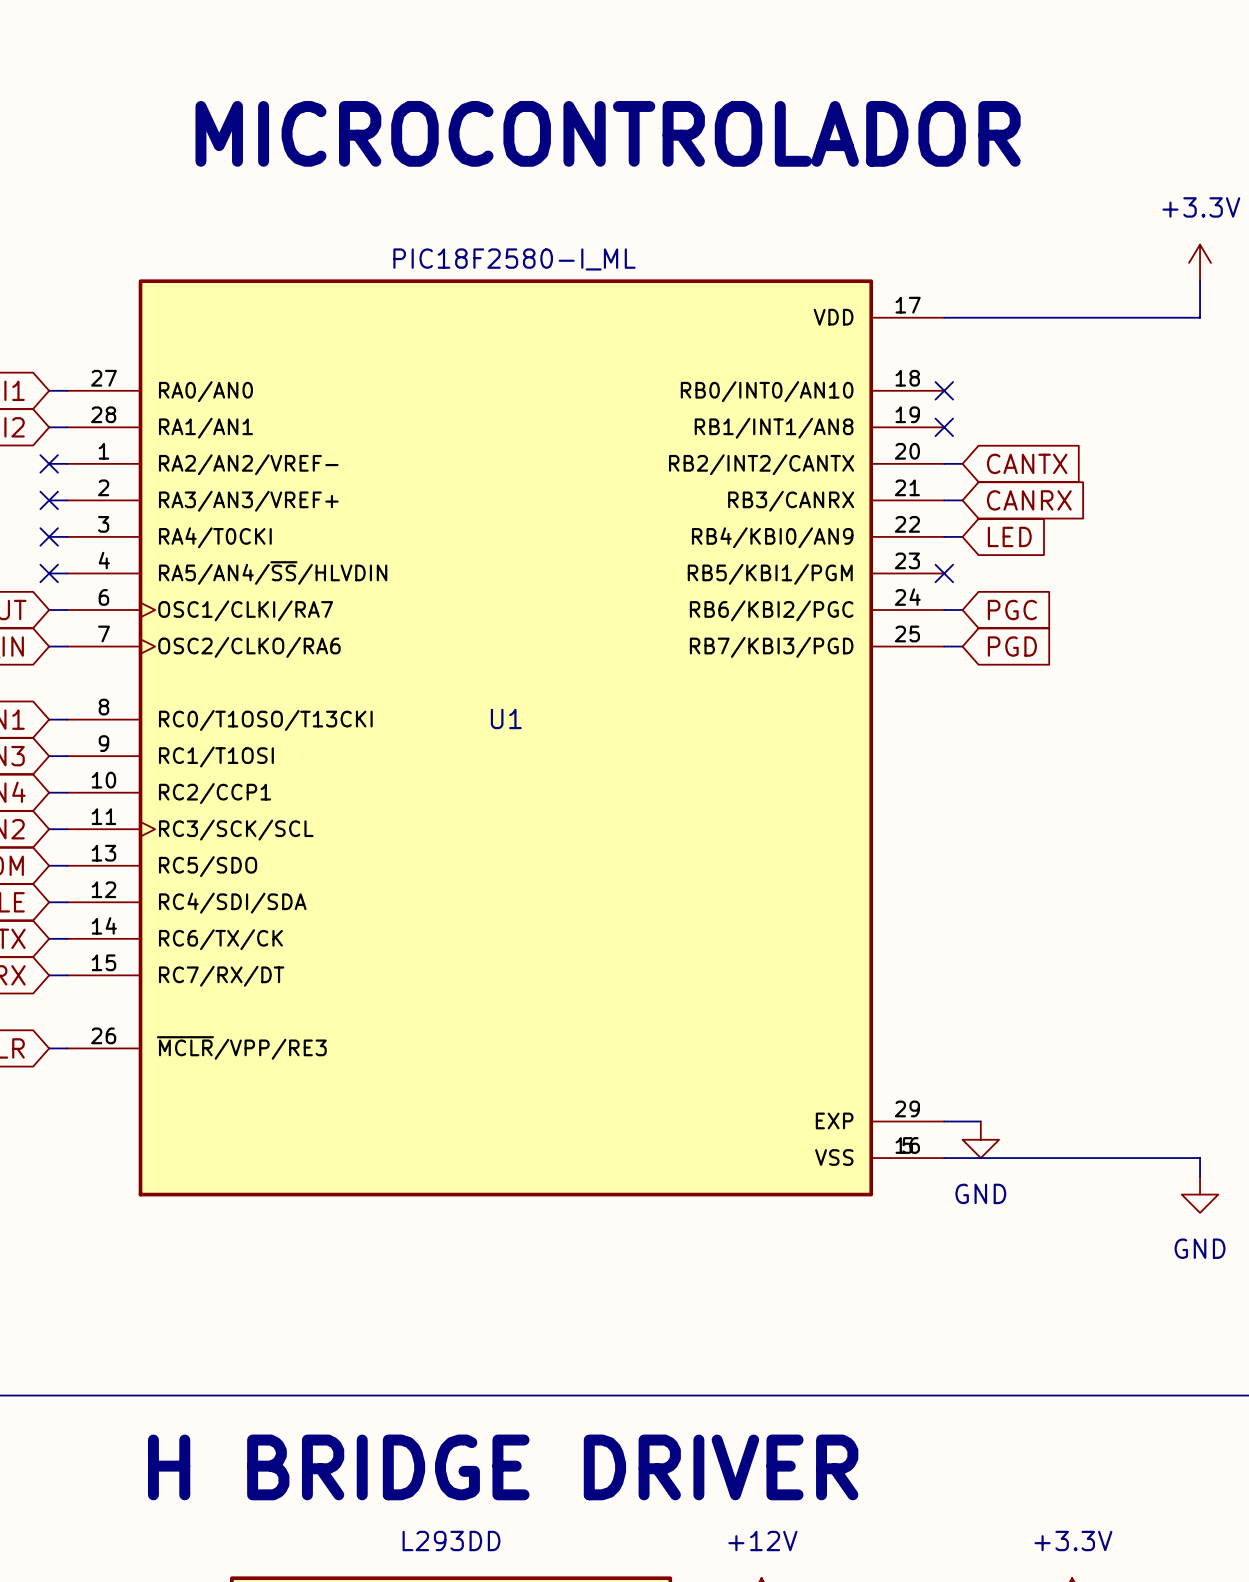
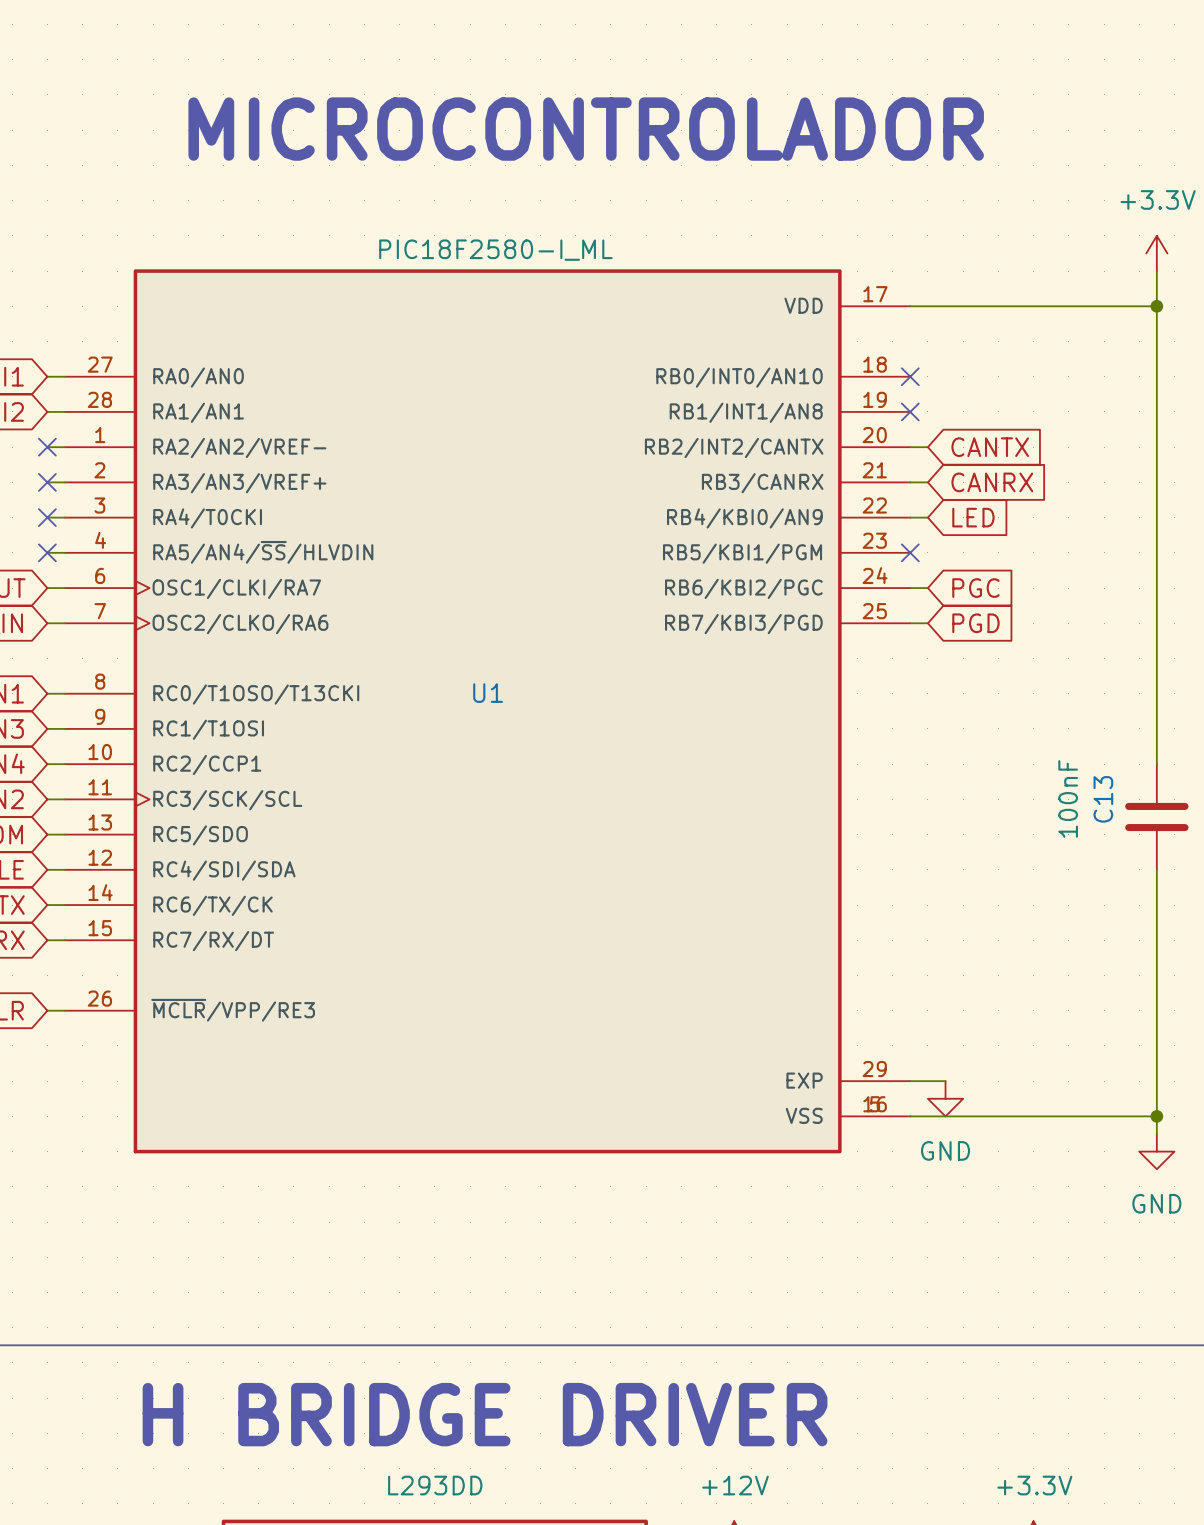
wire: none -> (1156, 306) (1156, 764)
junction: none -> (1156, 306)
C13: none -> 100nF (1156, 816)
wire: none -> (1156, 869) (1156, 1116)
junction: none -> (1156, 1116)

